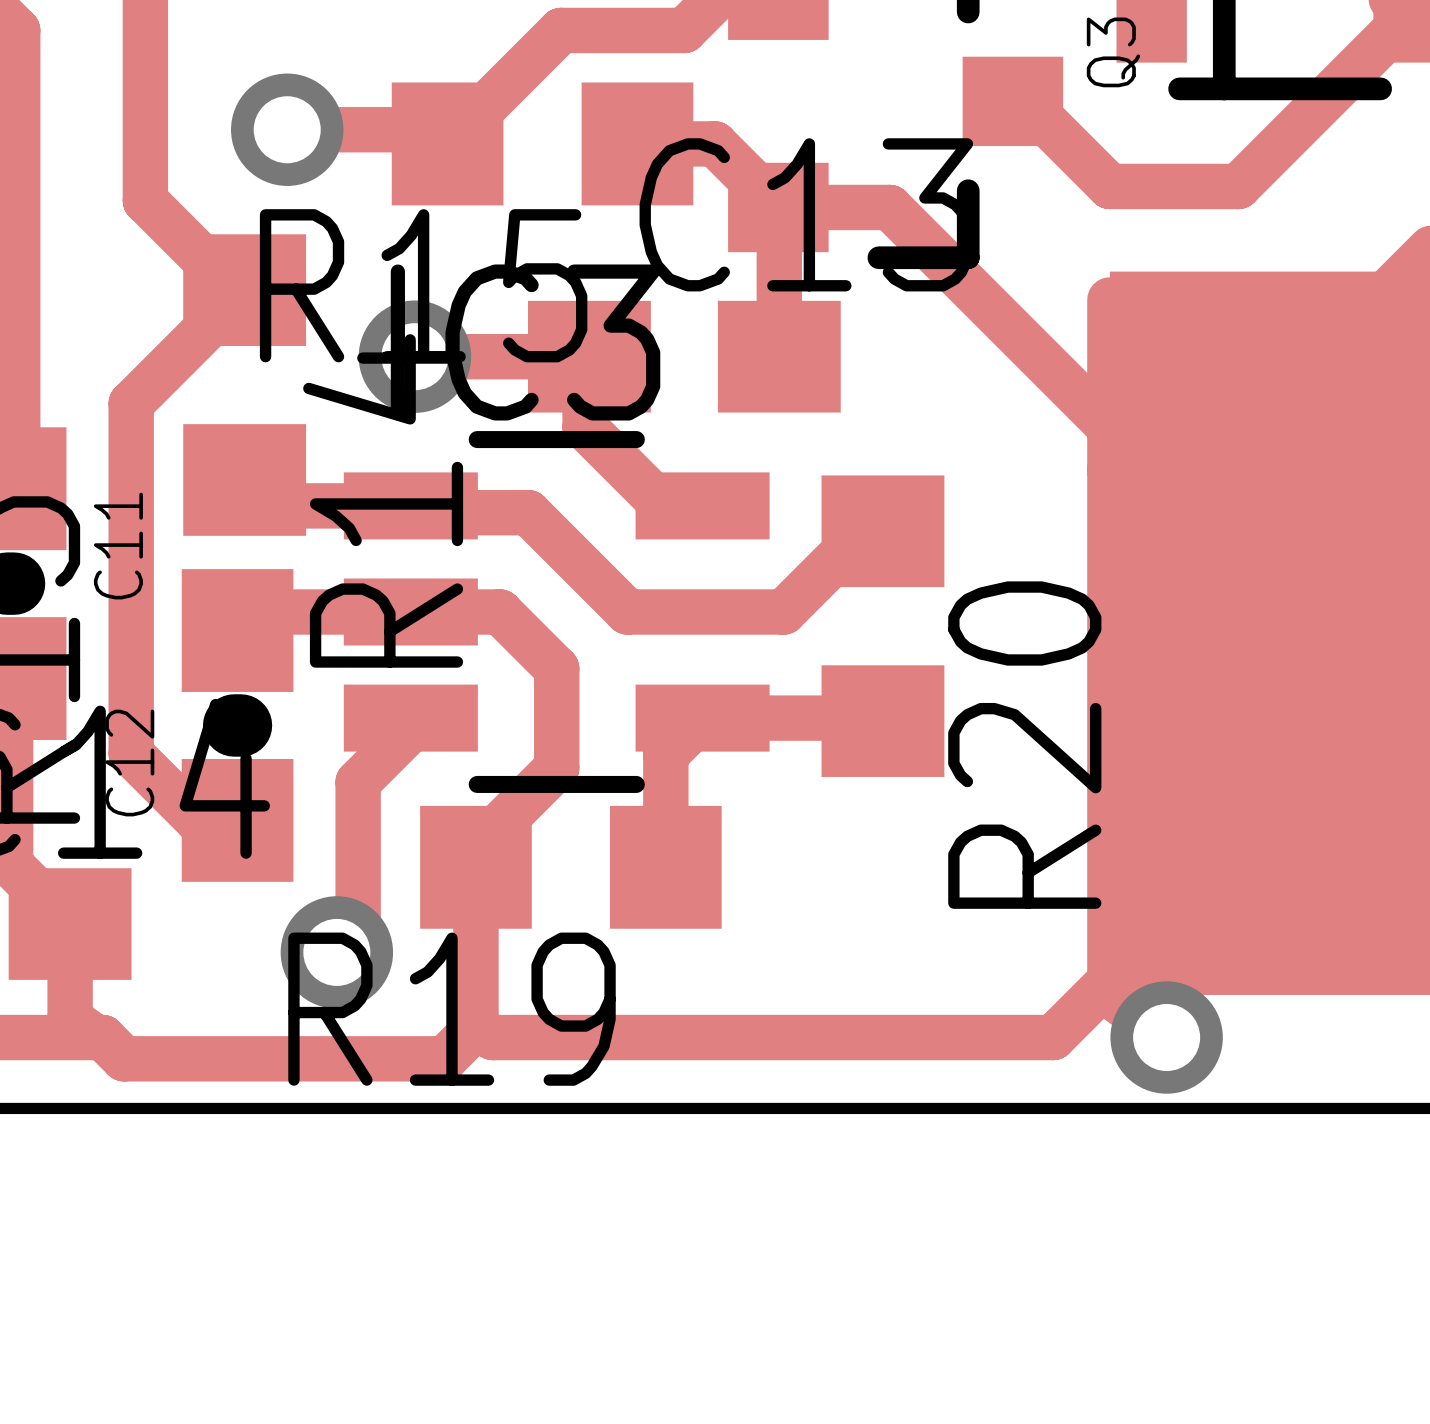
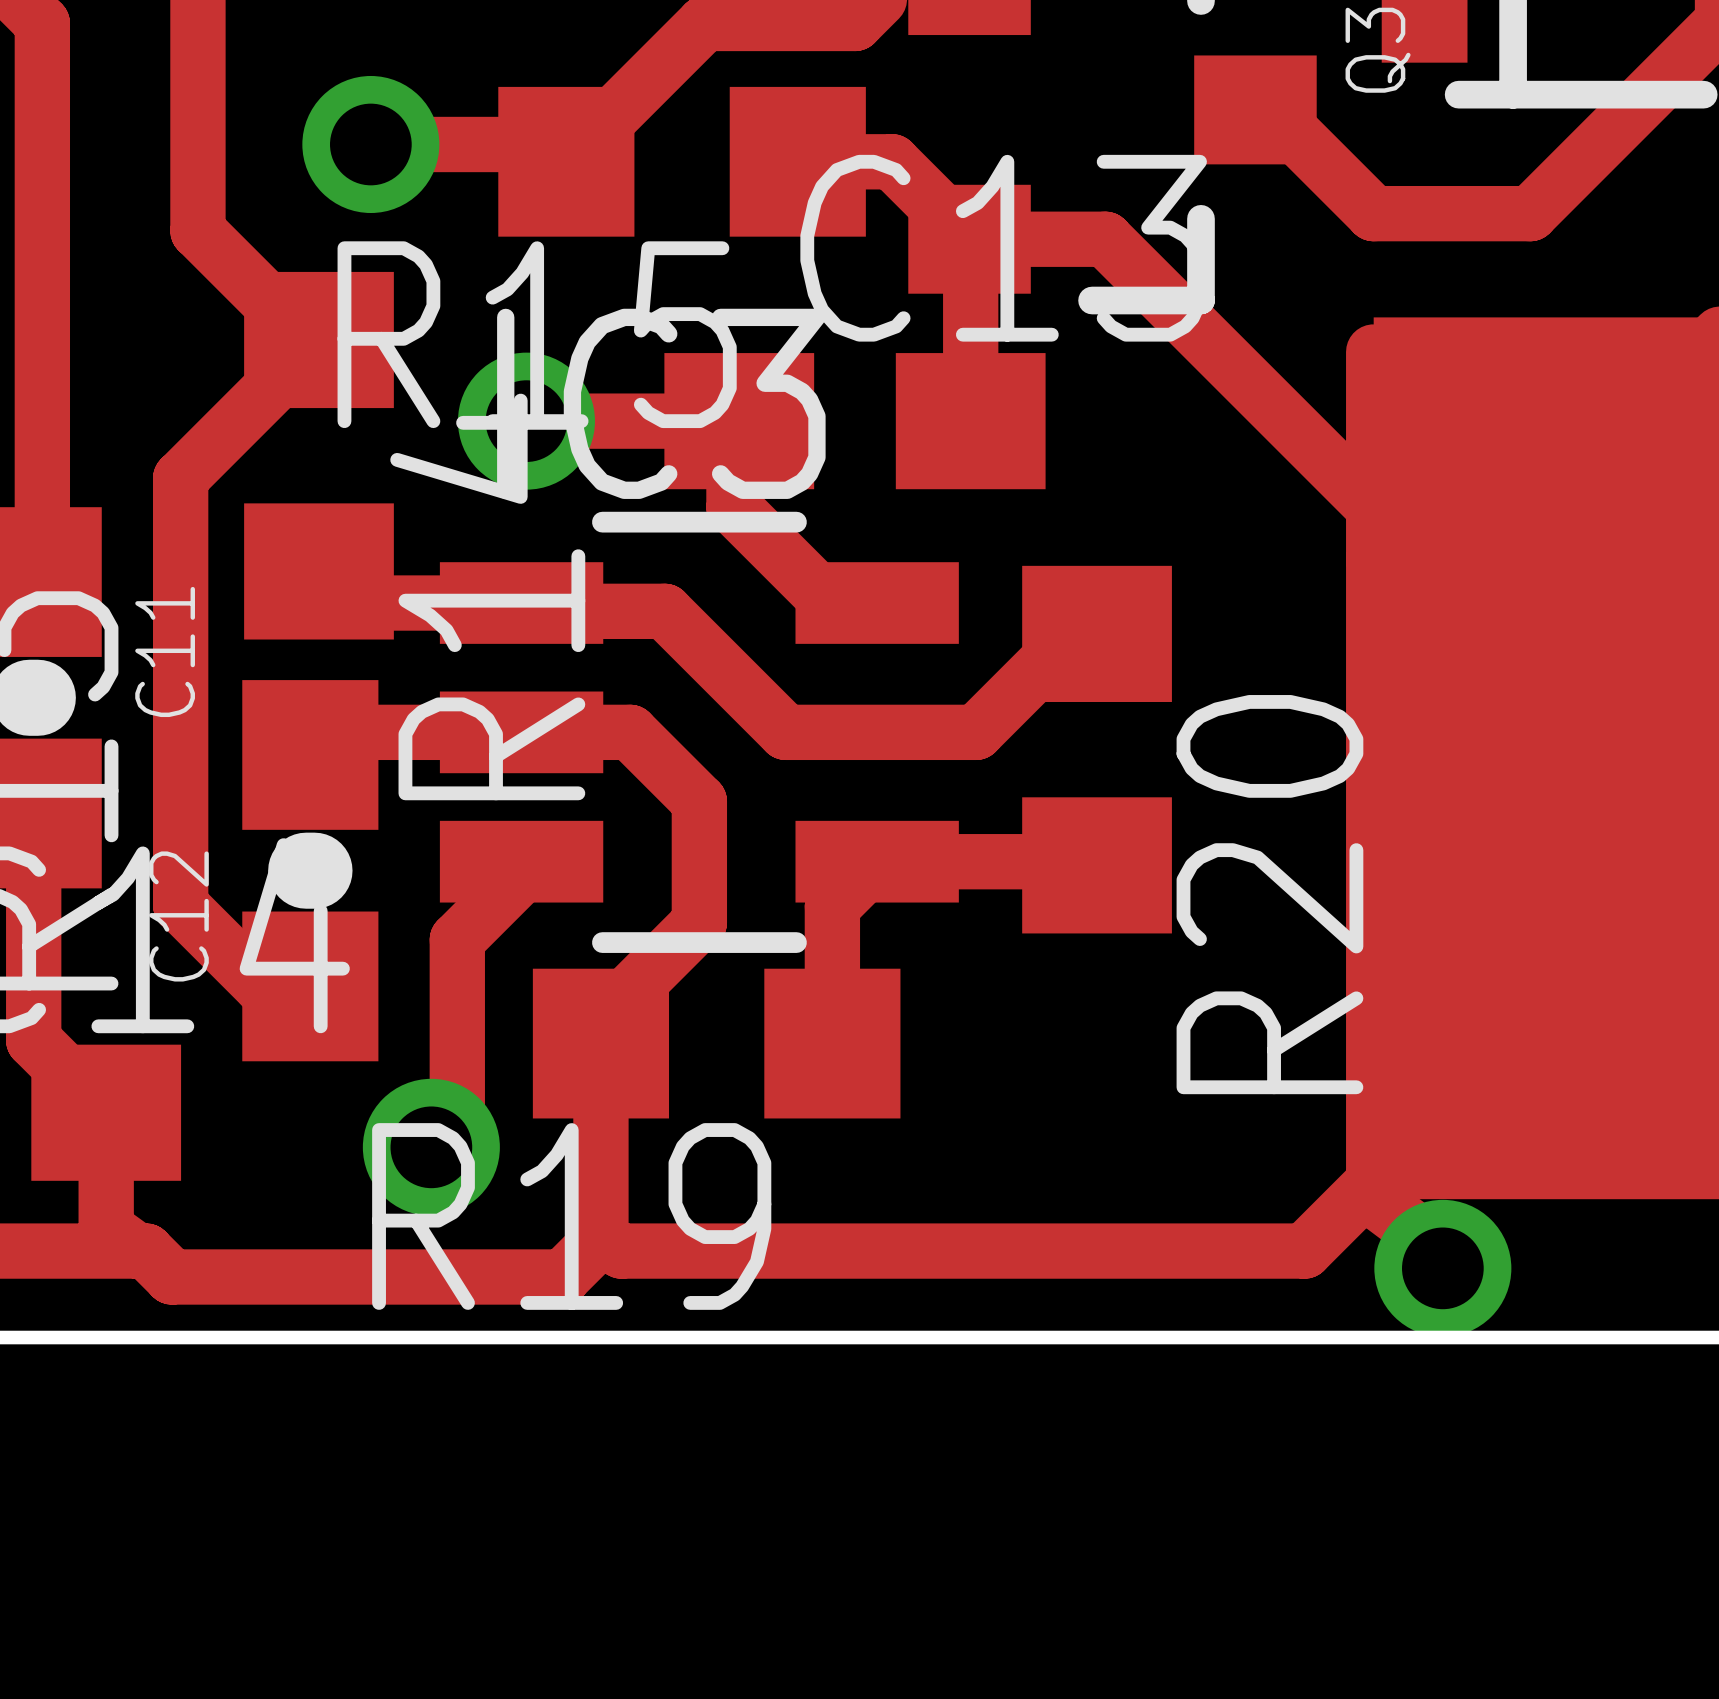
via position: (1166, 1037) -> (1442, 1268)

